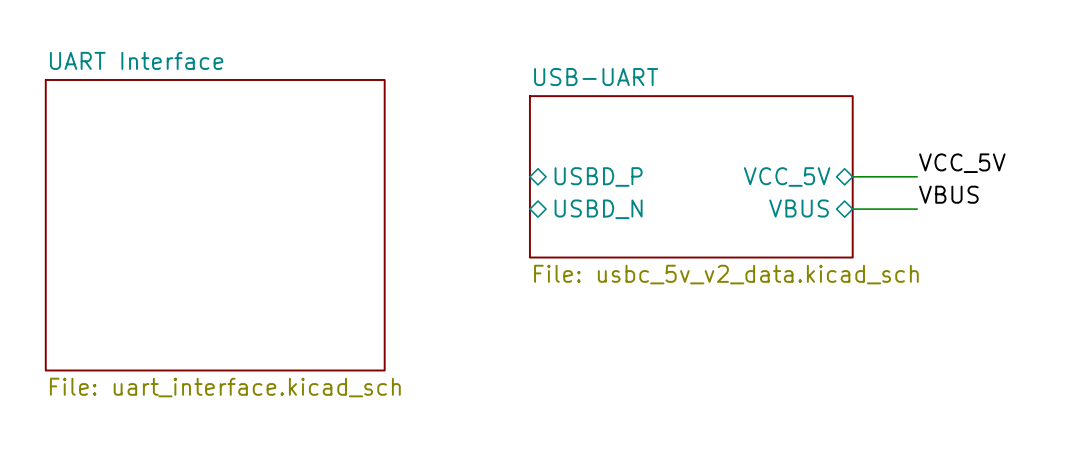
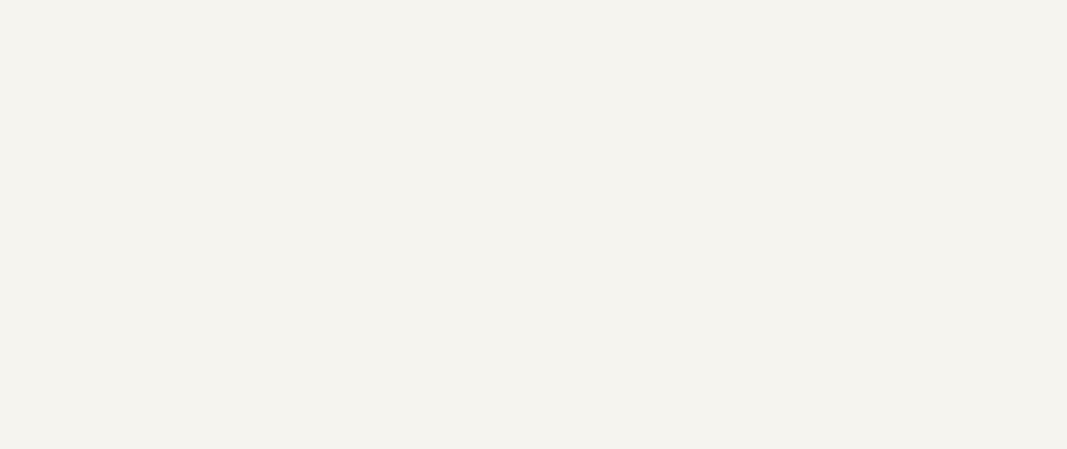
label: VCC_5V (962, 163) -> none
sheet pin: USBD_P (598, 176) -> none
sheet USB-UART: File: usbc_5v_v2_data.kicad_sch (691, 176) -> none
sheet pin: VCC_5V (787, 176) -> none
wire: (852, 176) (917, 176) -> none
label: VBUS (948, 194) -> none
sheet pin: VBUS (799, 208) -> none
sheet pin: USBD_N (598, 209) -> none
wire: (852, 209) (917, 209) -> none
sheet UART Interface: File: uart_interface.kicad_sch (215, 225) -> none

